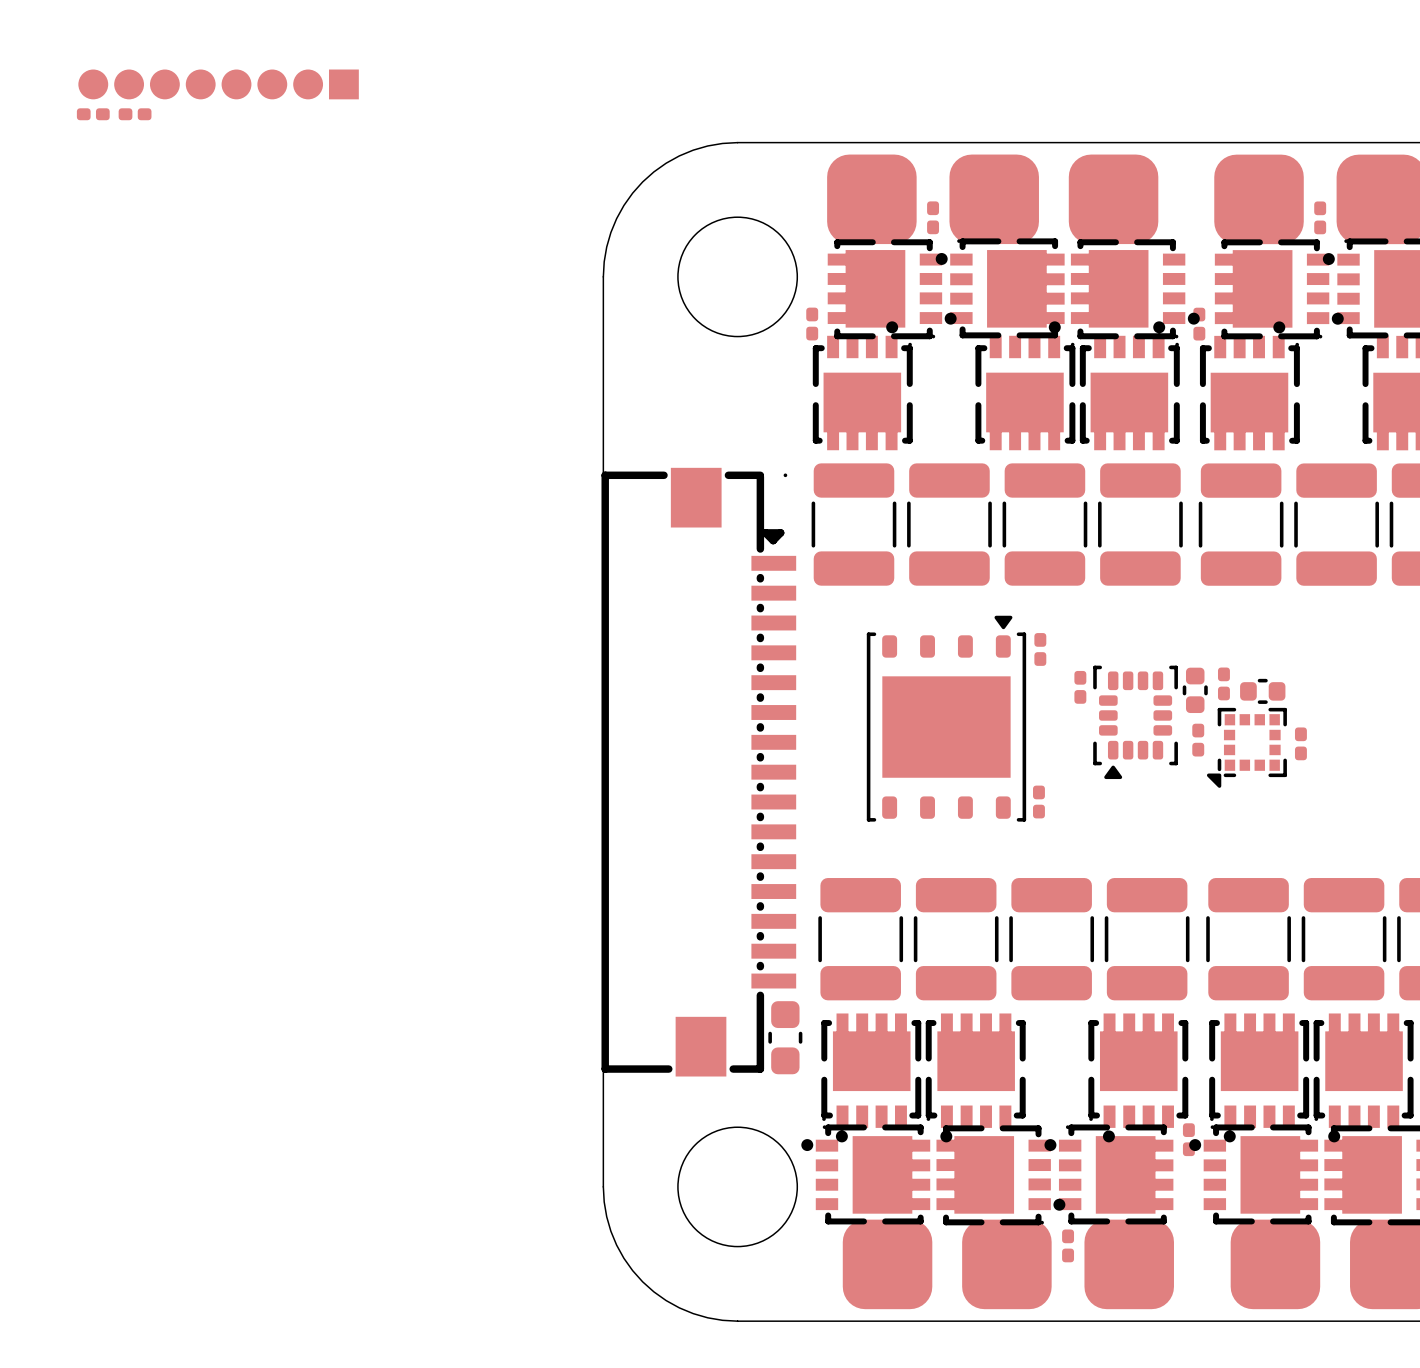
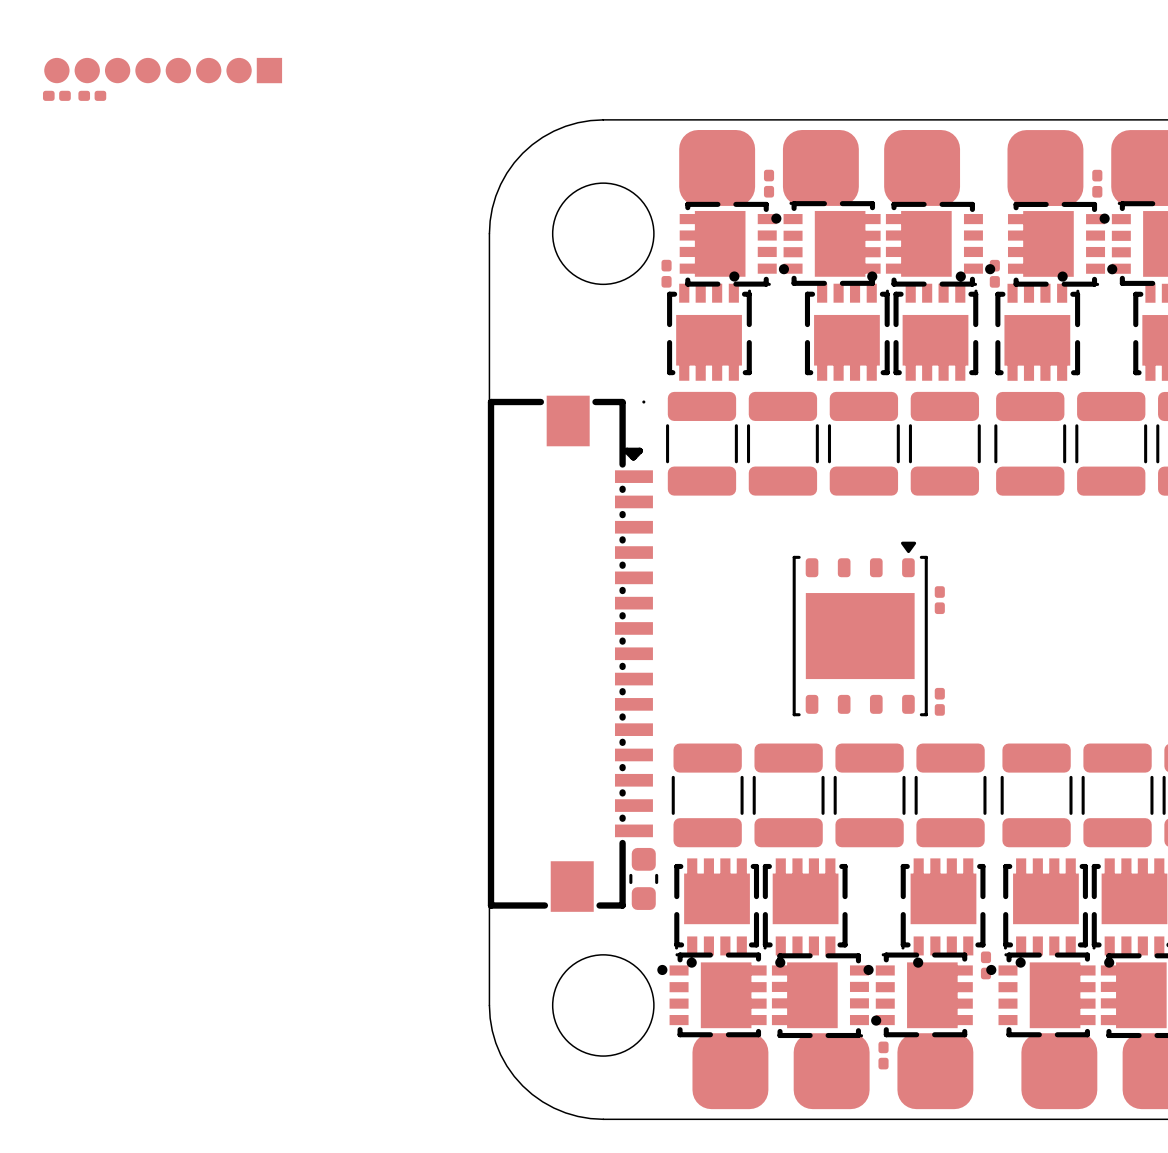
part: (1040, 649) -> none
part footprint: [1093, 665, 1178, 780] -> [934, 586, 945, 615]
part: (1223, 683) -> none
part: (1080, 687) -> none
part: (1195, 690) -> none
part: (1262, 691) -> none
part position: (946, 718) -> (860, 628)
part: (1198, 740) -> none
part: (1300, 743) -> none
part: (1246, 747) -> none
part: (1038, 802) -> none
part: none -> (939, 701)

